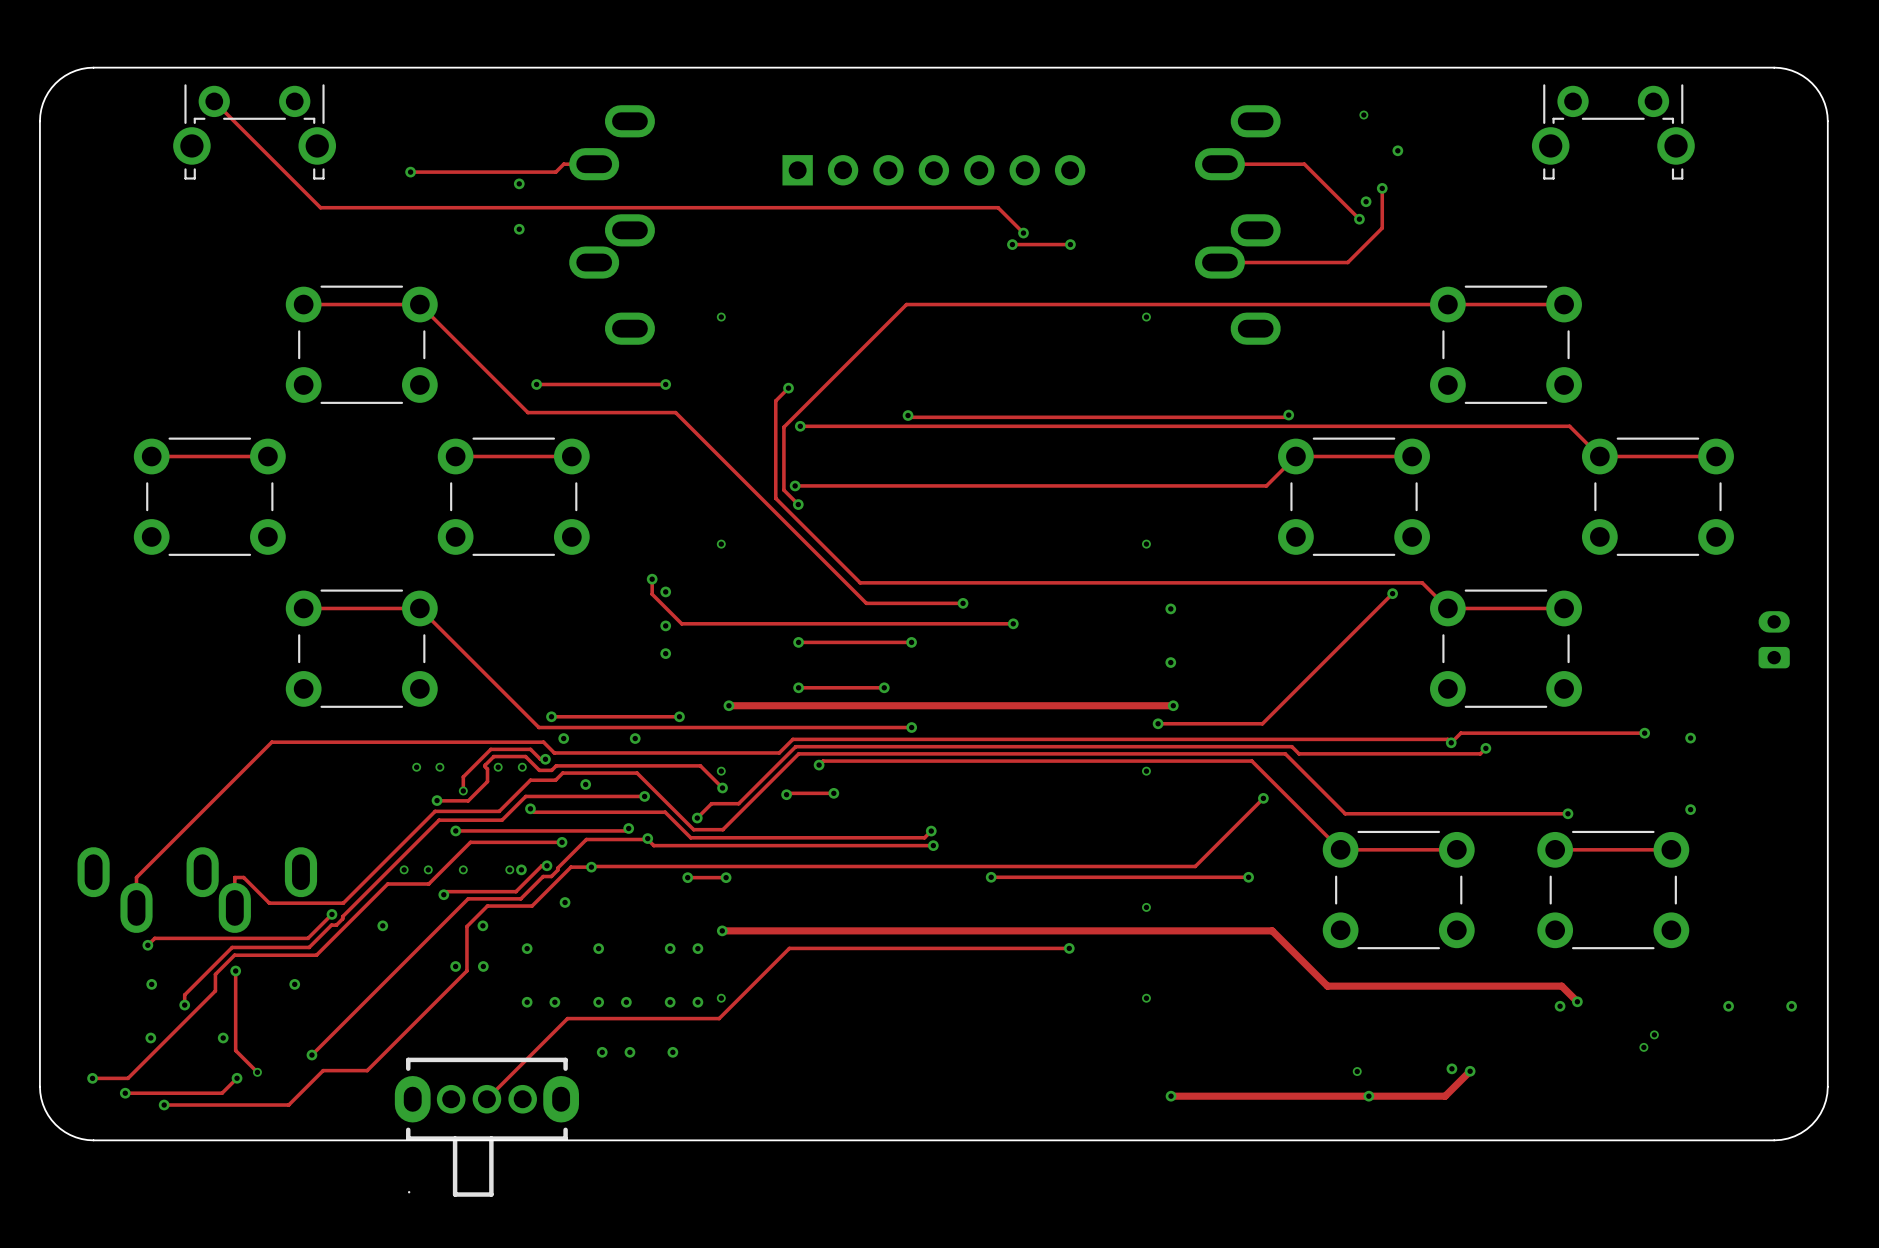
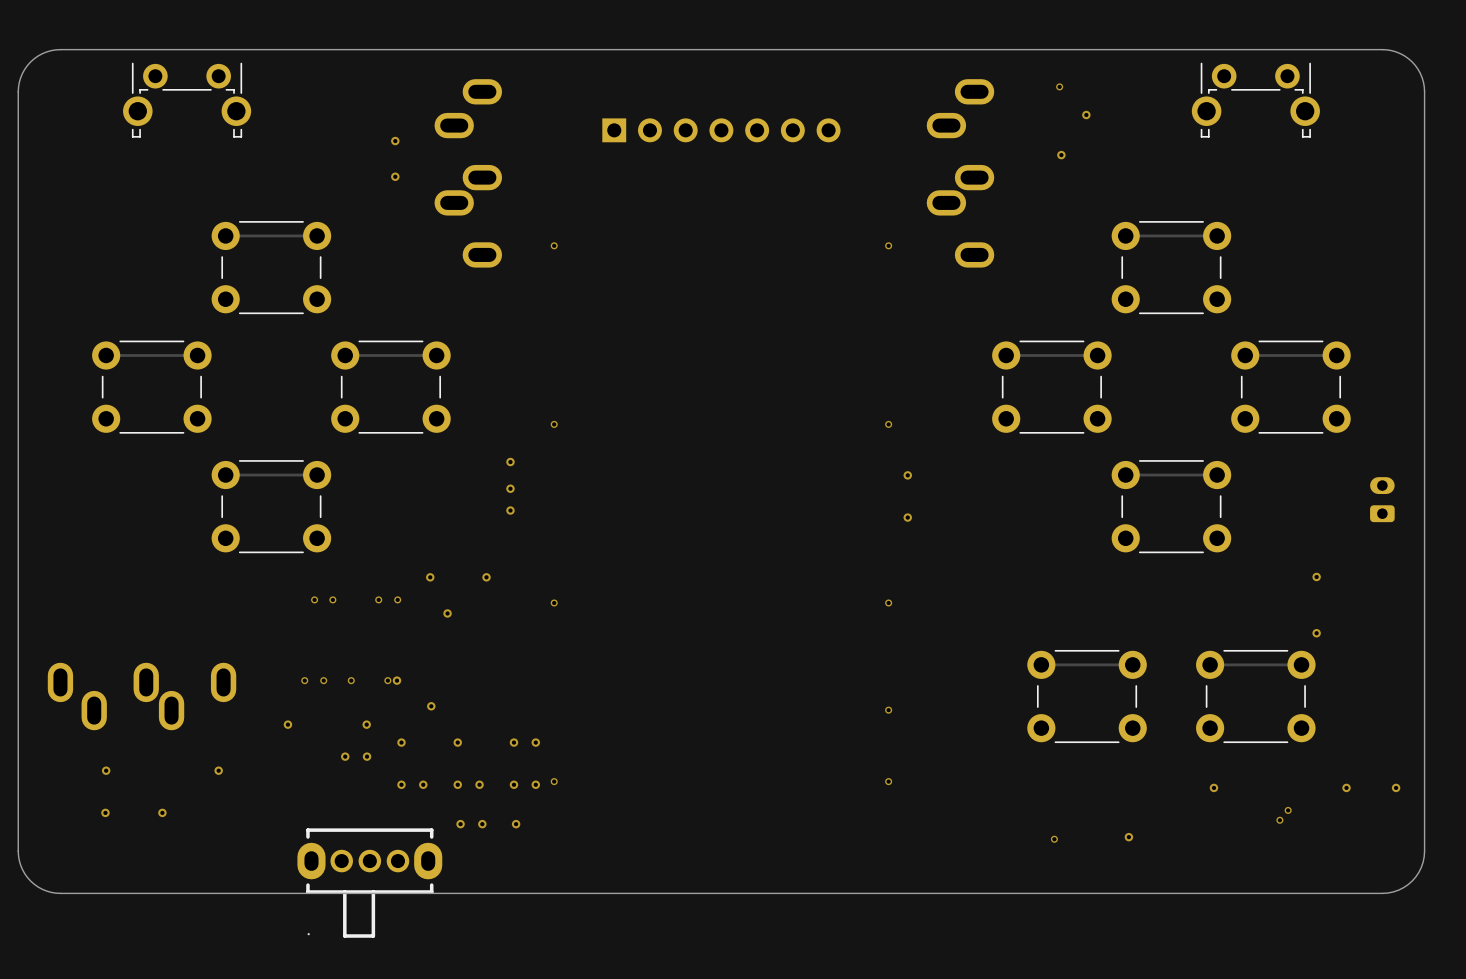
track: (214, 101) (320, 207) (998, 207) (1023, 233) -> none
track: (594, 164) (563, 164) (555, 172) (410, 172) -> none
track: (1219, 164) (1304, 164) (1359, 219) -> none
via: (410, 172) -> none
track: (1382, 188) (1382, 228) (1347, 262) (1219, 262) -> none
via: (1382, 188) -> none
via: (1359, 219) -> none
via: (1023, 233) -> none
track: (1012, 244) (1070, 244) -> none
via: (1012, 244) -> none
via: (1070, 244) -> none
track: (419, 304) (527, 412) (675, 412) (866, 603) (963, 603) -> none
track: (1447, 304) (906, 304) (783, 427) (783, 490) (798, 504) -> none
track: (536, 384) (665, 384) -> none
via: (536, 384) -> none
via: (665, 384) -> none
track: (788, 388) (775, 400) (775, 498) (860, 582) (1422, 582) (1447, 608) -> none
via: (788, 388) -> none
via: (908, 415) -> none
track: (1288, 415) (1286, 417) (909, 417) (908, 415) -> none
via: (1288, 415) -> none
track: (800, 426) (1569, 426) (1599, 456) -> none
via: (800, 426) -> none
track: (1295, 456) (1266, 485) (795, 485) -> none
via: (795, 485) -> none
via: (798, 504) -> none
track: (652, 579) (652, 594) (681, 623) (1013, 623) -> none
via: (652, 579) -> none
track: (1392, 593) (1262, 723) (1158, 723) -> none
via: (1392, 593) -> none
via: (963, 603) -> none
track: (419, 608) (538, 727) (911, 727) -> none
via: (1013, 623) -> none
track: (798, 642) (911, 642) -> none
via: (798, 642) -> none
via: (911, 642) -> none
track: (798, 687) (884, 687) -> none
via: (798, 687) -> none
via: (884, 687) -> none
track: (728, 705) (1173, 705) -> none
via: (728, 705) -> none
via: (1173, 705) -> none
track: (551, 716) (679, 716) -> none
via: (551, 716) -> none
via: (679, 716) -> none
via: (1158, 723) -> none
via: (911, 727) -> none
track: (1644, 733) (1460, 733) (1451, 742) (1447, 739) (792, 739) (779, 752) (554, 752) (543, 742) (271, 742) (136, 877) (136, 907) -> none
via: (1644, 733) -> none
via: (1451, 742) -> none
track: (1485, 748) (1480, 753) (1299, 753) (1291, 746) (795, 746) (738, 803) (711, 803) (697, 818) -> none
via: (1485, 748) -> none
track: (545, 759) (540, 759) (530, 749) (490, 749) (463, 776) (463, 790) -> none
via: (545, 759) -> none
track: (819, 765) (823, 761) (1251, 761) (1340, 849) -> none
via: (819, 765) -> none
track: (722, 788) (700, 765) (556, 765) (551, 770) (539, 770) (525, 756) (493, 756) (485, 765) (487, 769) (487, 781) (468, 800) (437, 800) -> none
via: (722, 788) -> none
via: (463, 790) -> none
track: (833, 793) (786, 794) -> none
via: (833, 793) -> none
via: (786, 794) -> none
track: (644, 796) (525, 796) (502, 820) (439, 820) (336, 925) (331, 925) (309, 947) (232, 947) (184, 994) (184, 1005) -> none
via: (644, 796) -> none
track: (1263, 798) (1195, 866) (570, 867) (532, 906) (487, 906) (466, 926) (466, 970) (367, 1070) (323, 1070) (288, 1105) (164, 1105) -> none
via: (1263, 798) -> none
via: (437, 800) -> none
track: (530, 808) (533, 812) (665, 812) (690, 837) (924, 837) (931, 831) -> none
via: (530, 808) -> none
track: (1567, 813) (1345, 813) (1285, 753) (798, 753) (722, 829) (693, 829) (637, 773) (562, 773) (555, 780) (530, 780) (499, 811) (435, 811) (343, 903) (269, 903) (243, 877) (234, 877) (234, 907) -> none
via: (1567, 813) -> none
via: (697, 818) -> none
track: (628, 828) (626, 830) (455, 830) -> none
via: (628, 828) -> none
via: (455, 830) -> none
via: (931, 831) -> none
via: (647, 838) -> none
track: (647, 839) (586, 839) (551, 876) (543, 876) (520, 898) (468, 898) (311, 1055) -> none
track: (647, 839) (653, 845) (933, 845) -> none
track: (562, 842) (470, 842) (428, 884) (387, 884) (316, 955) (234, 955) (215, 974) (215, 990) (127, 1078) (92, 1078) -> none
via: (562, 842) -> none
via: (933, 845) -> none
track: (546, 865) (541, 865) (515, 891) (446, 891) (443, 894) -> none
via: (546, 865) -> none
via: (591, 867) -> none
track: (687, 877) (726, 877) -> none
via: (687, 877) -> none
via: (726, 877) -> none
track: (991, 877) (1248, 877) -> none
via: (991, 877) -> none
via: (1248, 877) -> none
via: (443, 894) -> none
track: (331, 914) (308, 938) (154, 938) (147, 945) -> none
via: (331, 914) -> none
track: (722, 930) (1272, 930) (1327, 986) (1561, 986) (1577, 1001) -> none
via: (722, 930) -> none
via: (147, 945) -> none
track: (1069, 948) (789, 948) (719, 1018) (567, 1018) (486, 1099) -> none
via: (1069, 948) -> none
track: (235, 971) (235, 1050) (257, 1072) -> none
via: (235, 971) -> none
via: (1577, 1001) -> none
via: (184, 1005) -> none
via: (311, 1055) -> none
track: (1470, 1071) (1445, 1096) (1171, 1096) -> none
via: (1470, 1071) -> none
via: (257, 1072) -> none
via: (92, 1078) -> none
track: (237, 1078) (222, 1093) (125, 1093) -> none
via: (237, 1078) -> none
via: (125, 1093) -> none
via: (1171, 1096) -> none
via: (1368, 1096) -> none
via: (164, 1105) -> none

